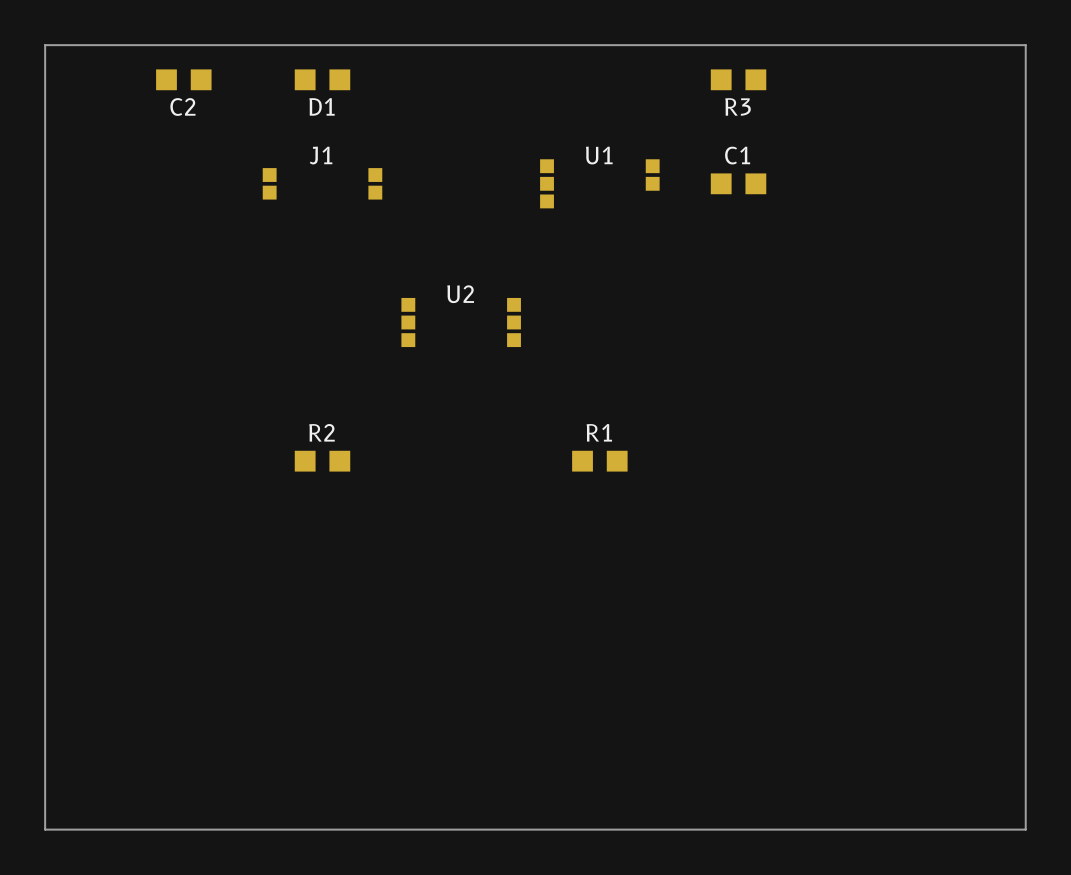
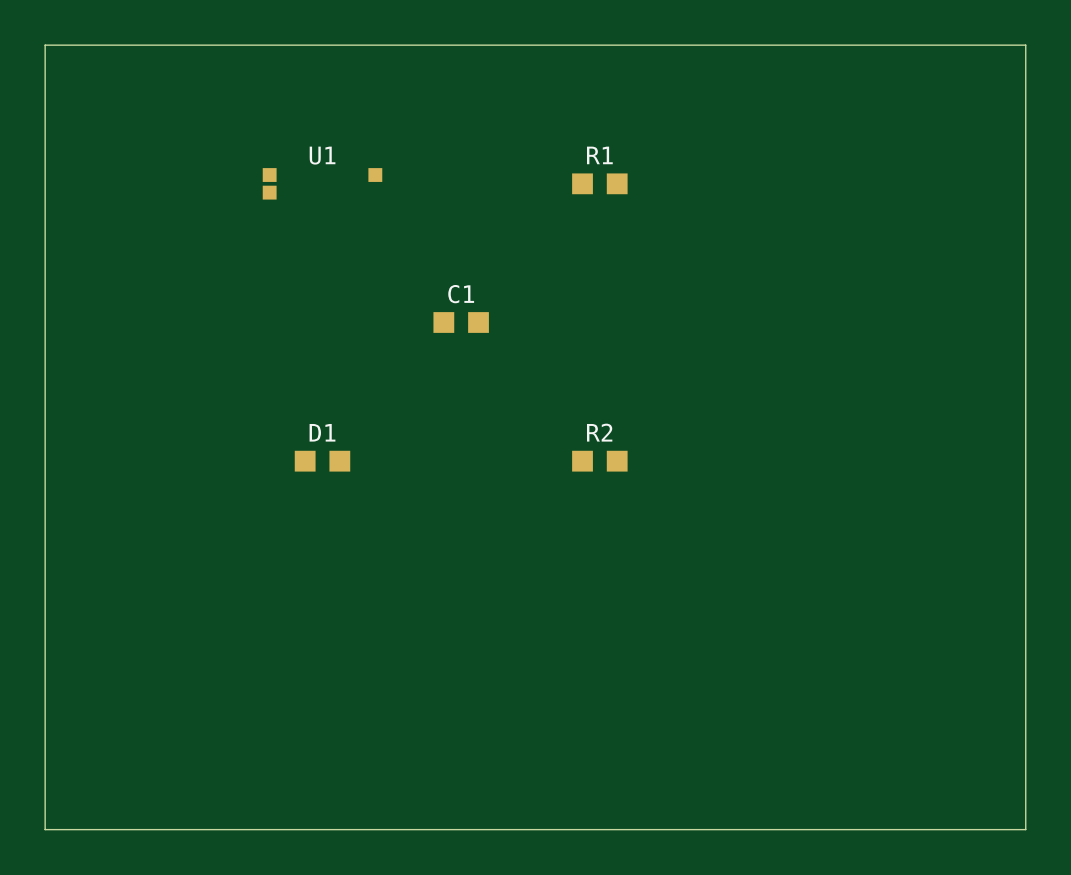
C2: (183, 79) -> none
D1: (322, 79) -> none
R3: (738, 79) -> none
U1 footprint: [540, 159, 660, 209] -> [262, 168, 383, 200]
J1: (322, 183) -> none
R1: none -> (599, 183)
C1 position: (738, 183) -> (461, 322)
U2: (461, 322) -> none
R2 name: R2 (321, 432) -> D1 (322, 432)
R1 name: R1 (599, 432) -> R2 (599, 432)

